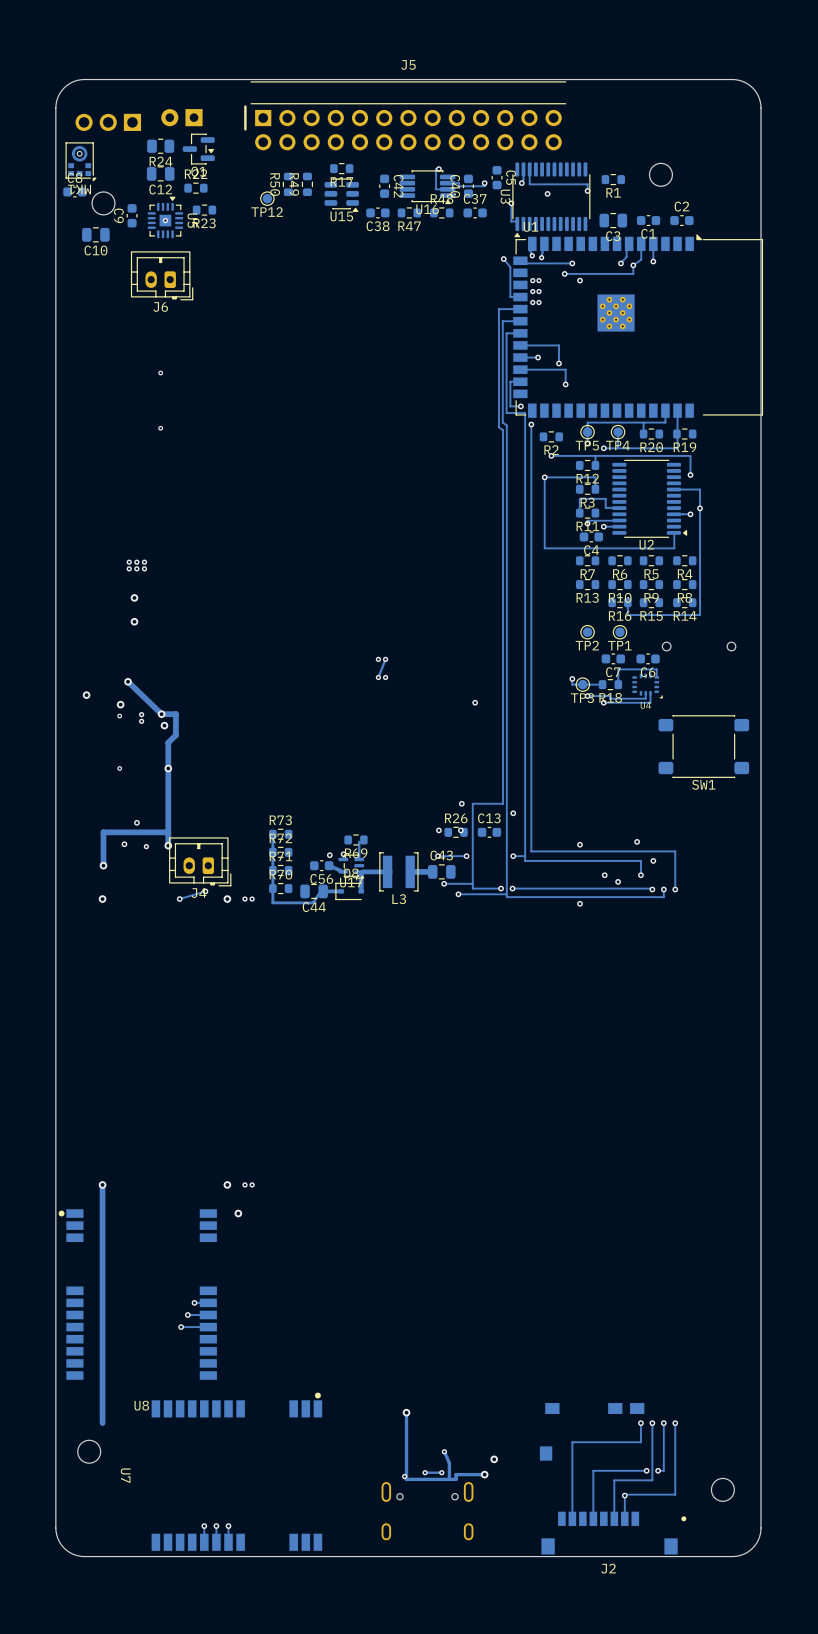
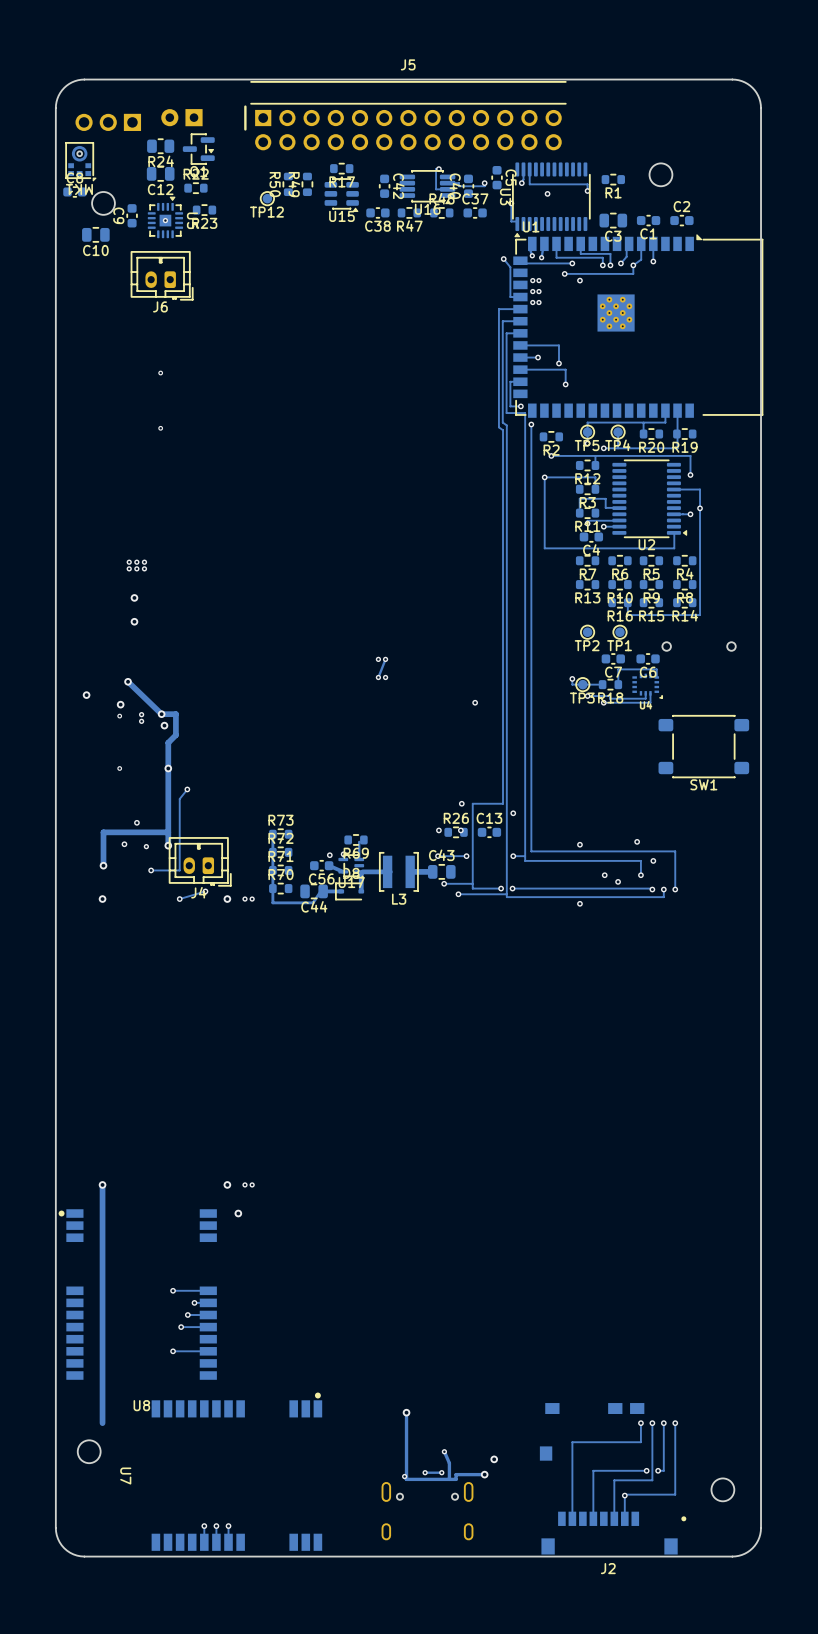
track: none -> (556, 250) (556, 257) (602, 257) (602, 265)
track: none -> (580, 250) (580, 253) (610, 253) (610, 265)
via: none -> (602, 265)
via: none -> (610, 265)
track: none -> (187, 789) (179, 798) (179, 870) (151, 870)
via: none -> (187, 789)
via: none -> (151, 870)
via: none -> (173, 1290)
track: none -> (202, 1290) (173, 1290)
via: none -> (173, 1351)
track: none -> (202, 1351) (173, 1351)

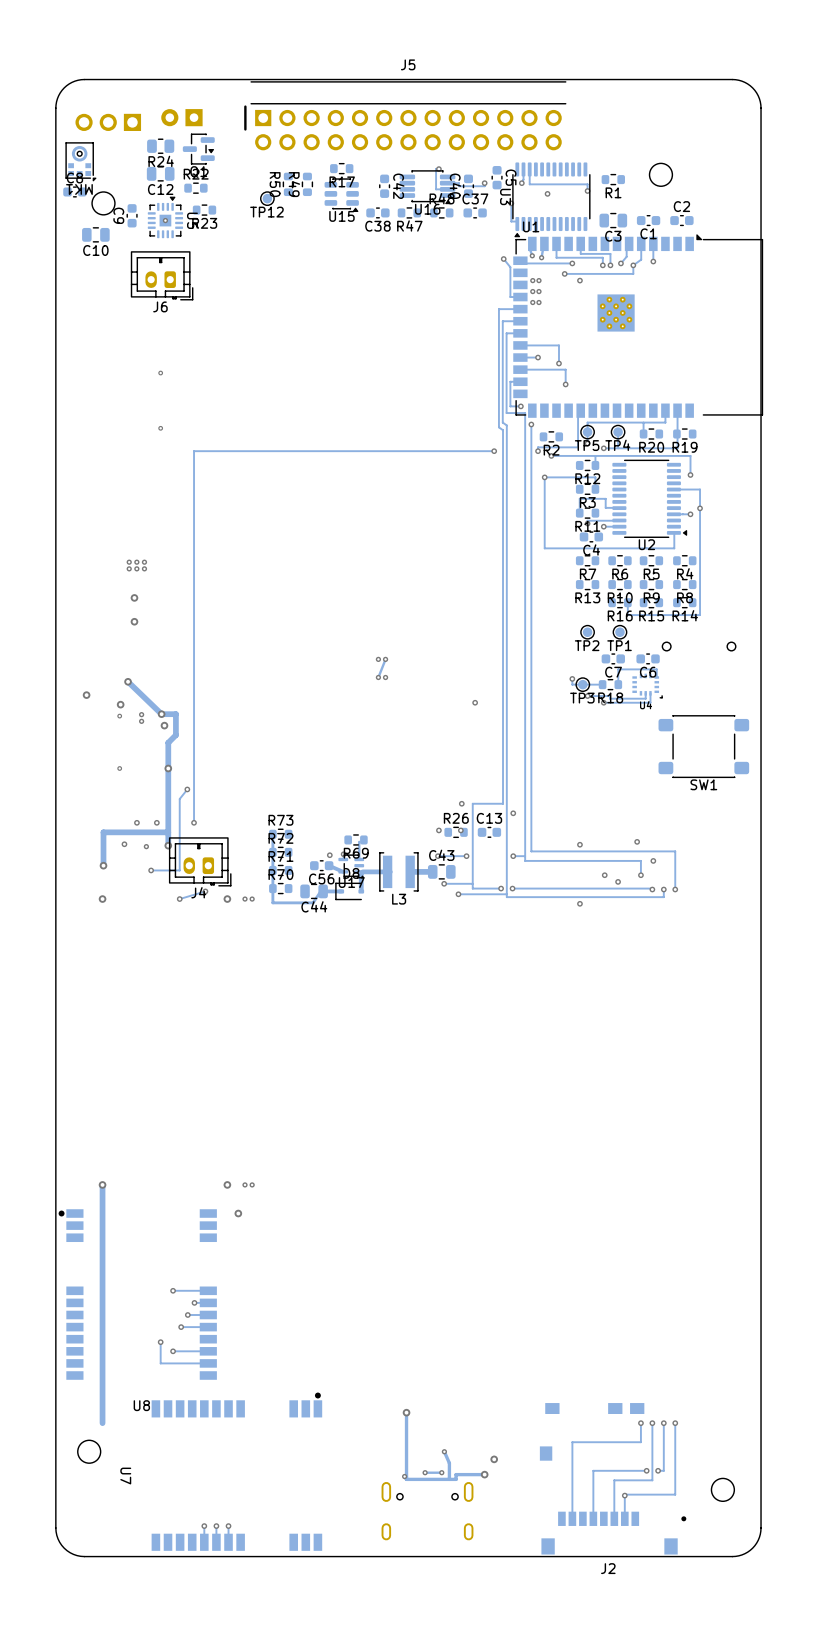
track: none -> (578, 413) (578, 447) (538, 447) (538, 451)
track: none -> (494, 451) (194, 451) (194, 822)
via: none -> (494, 451)
via: none -> (538, 451)
via: none -> (156, 822)
via: none -> (194, 822)
track: none -> (160, 1342) (160, 1363) (202, 1363)
via: none -> (160, 1342)

